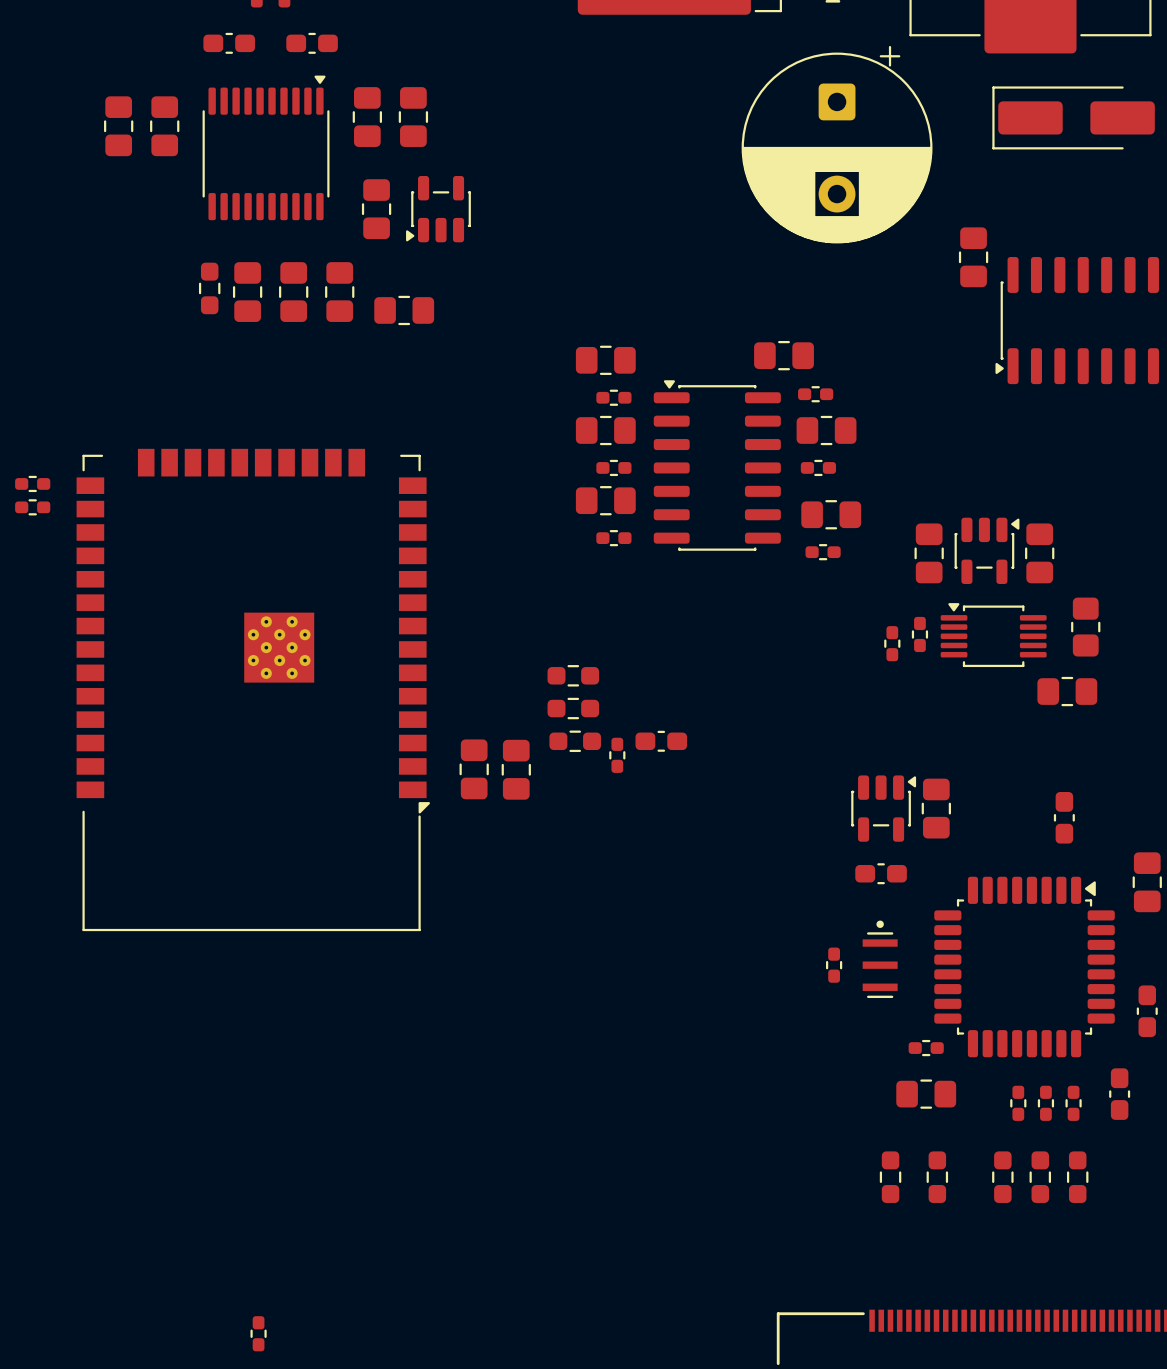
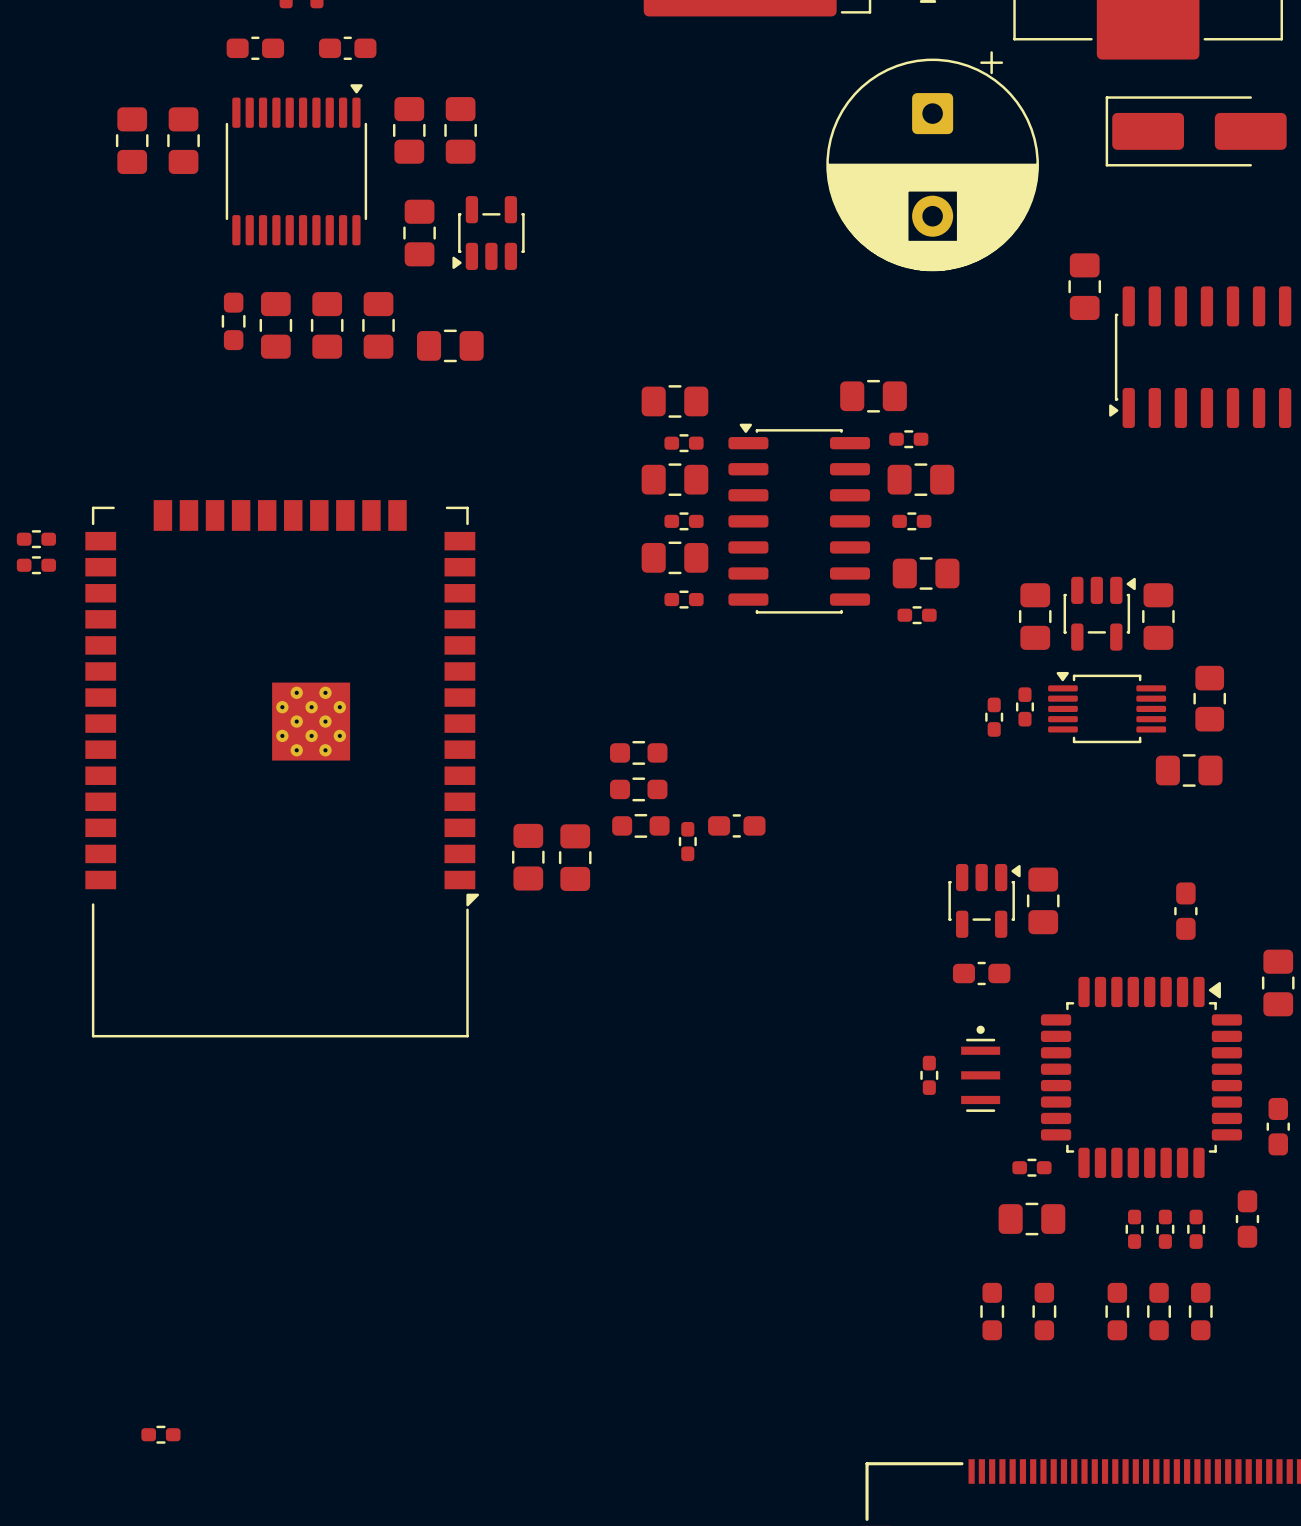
part rotation: 0° (258, 1333) -> 90° clockwise (160, 1434)
part position: (258, 1333) -> (160, 1434)

